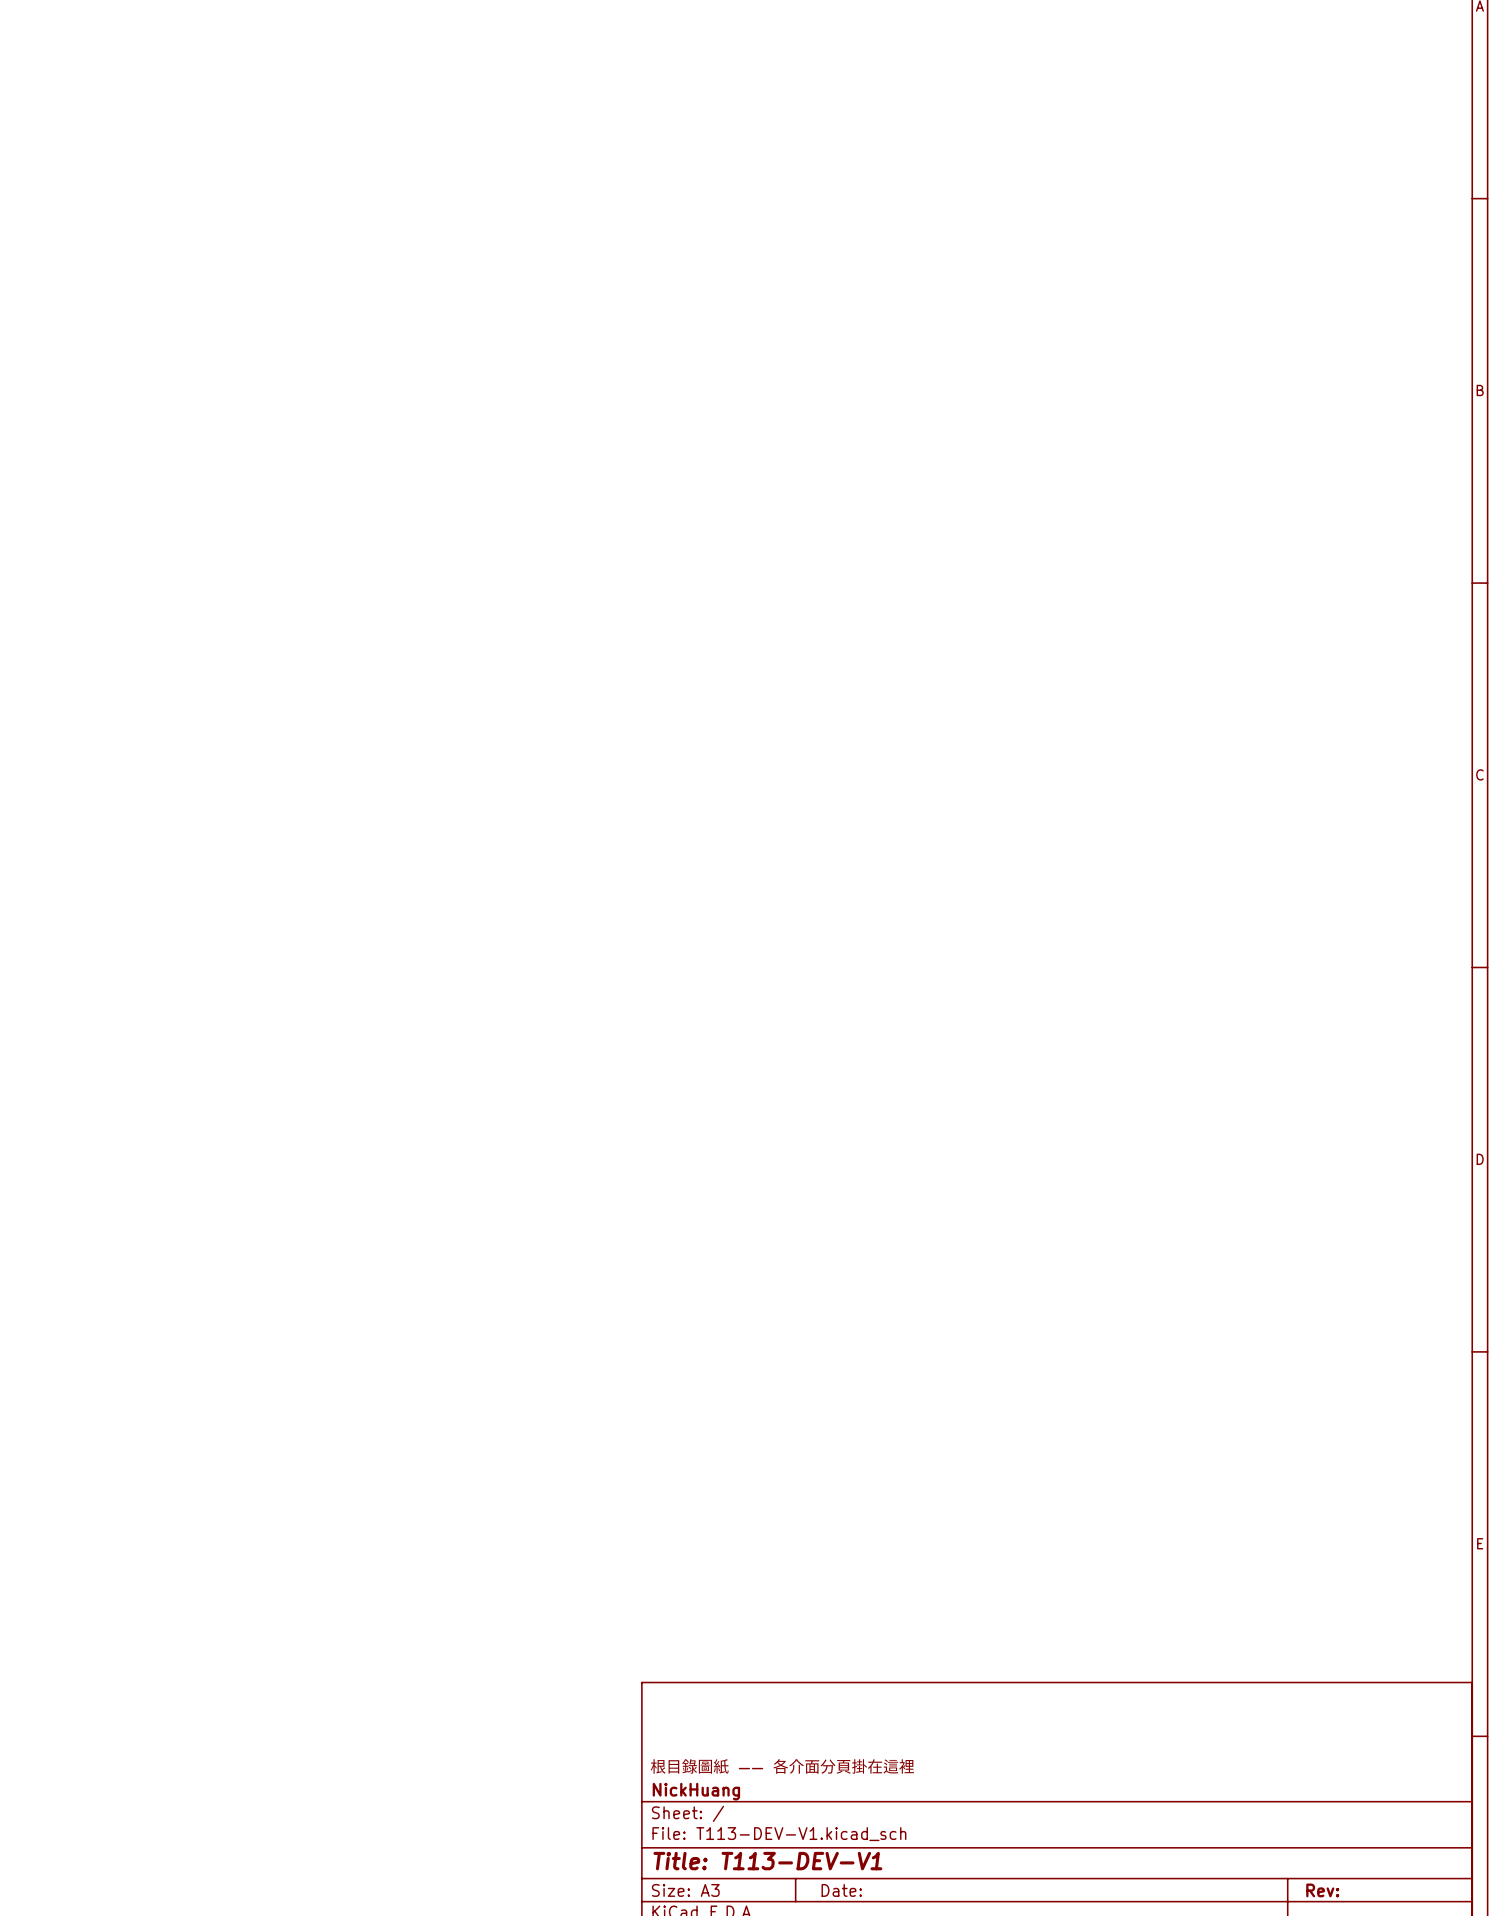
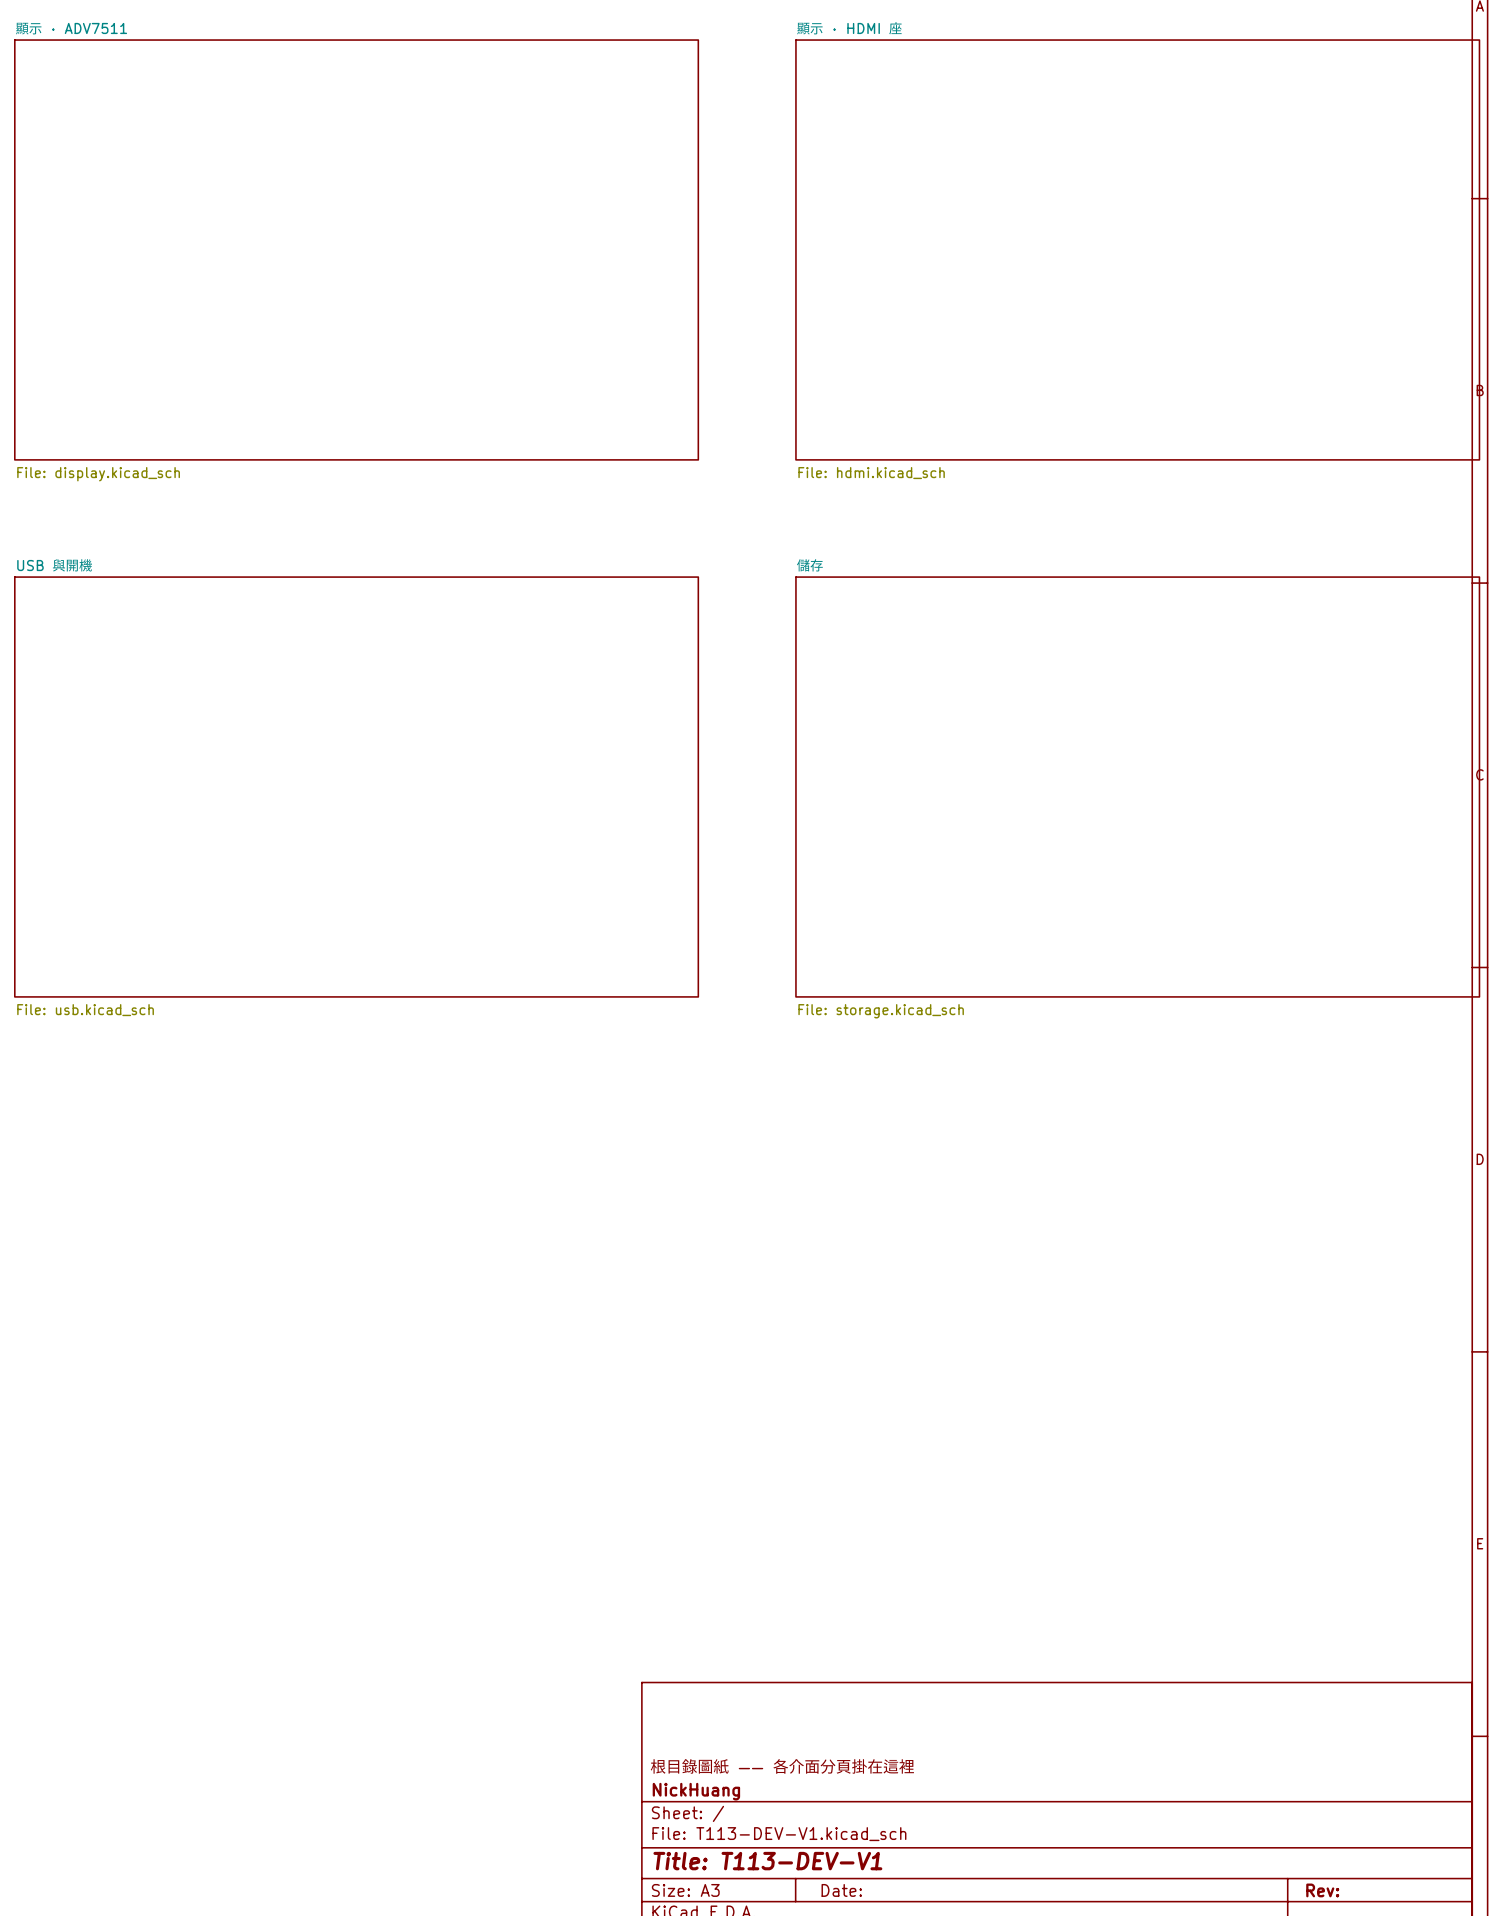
sheet 顯示 · ADV7511: none -> File: display.kicad_sch (356, 249)
sheet 顯示 · HDMI 座: none -> File: hdmi.kicad_sch (1137, 249)
sheet USB 與開機: none -> File: usb.kicad_sch (356, 787)
sheet 儲存: none -> File: storage.kicad_sch (1137, 787)

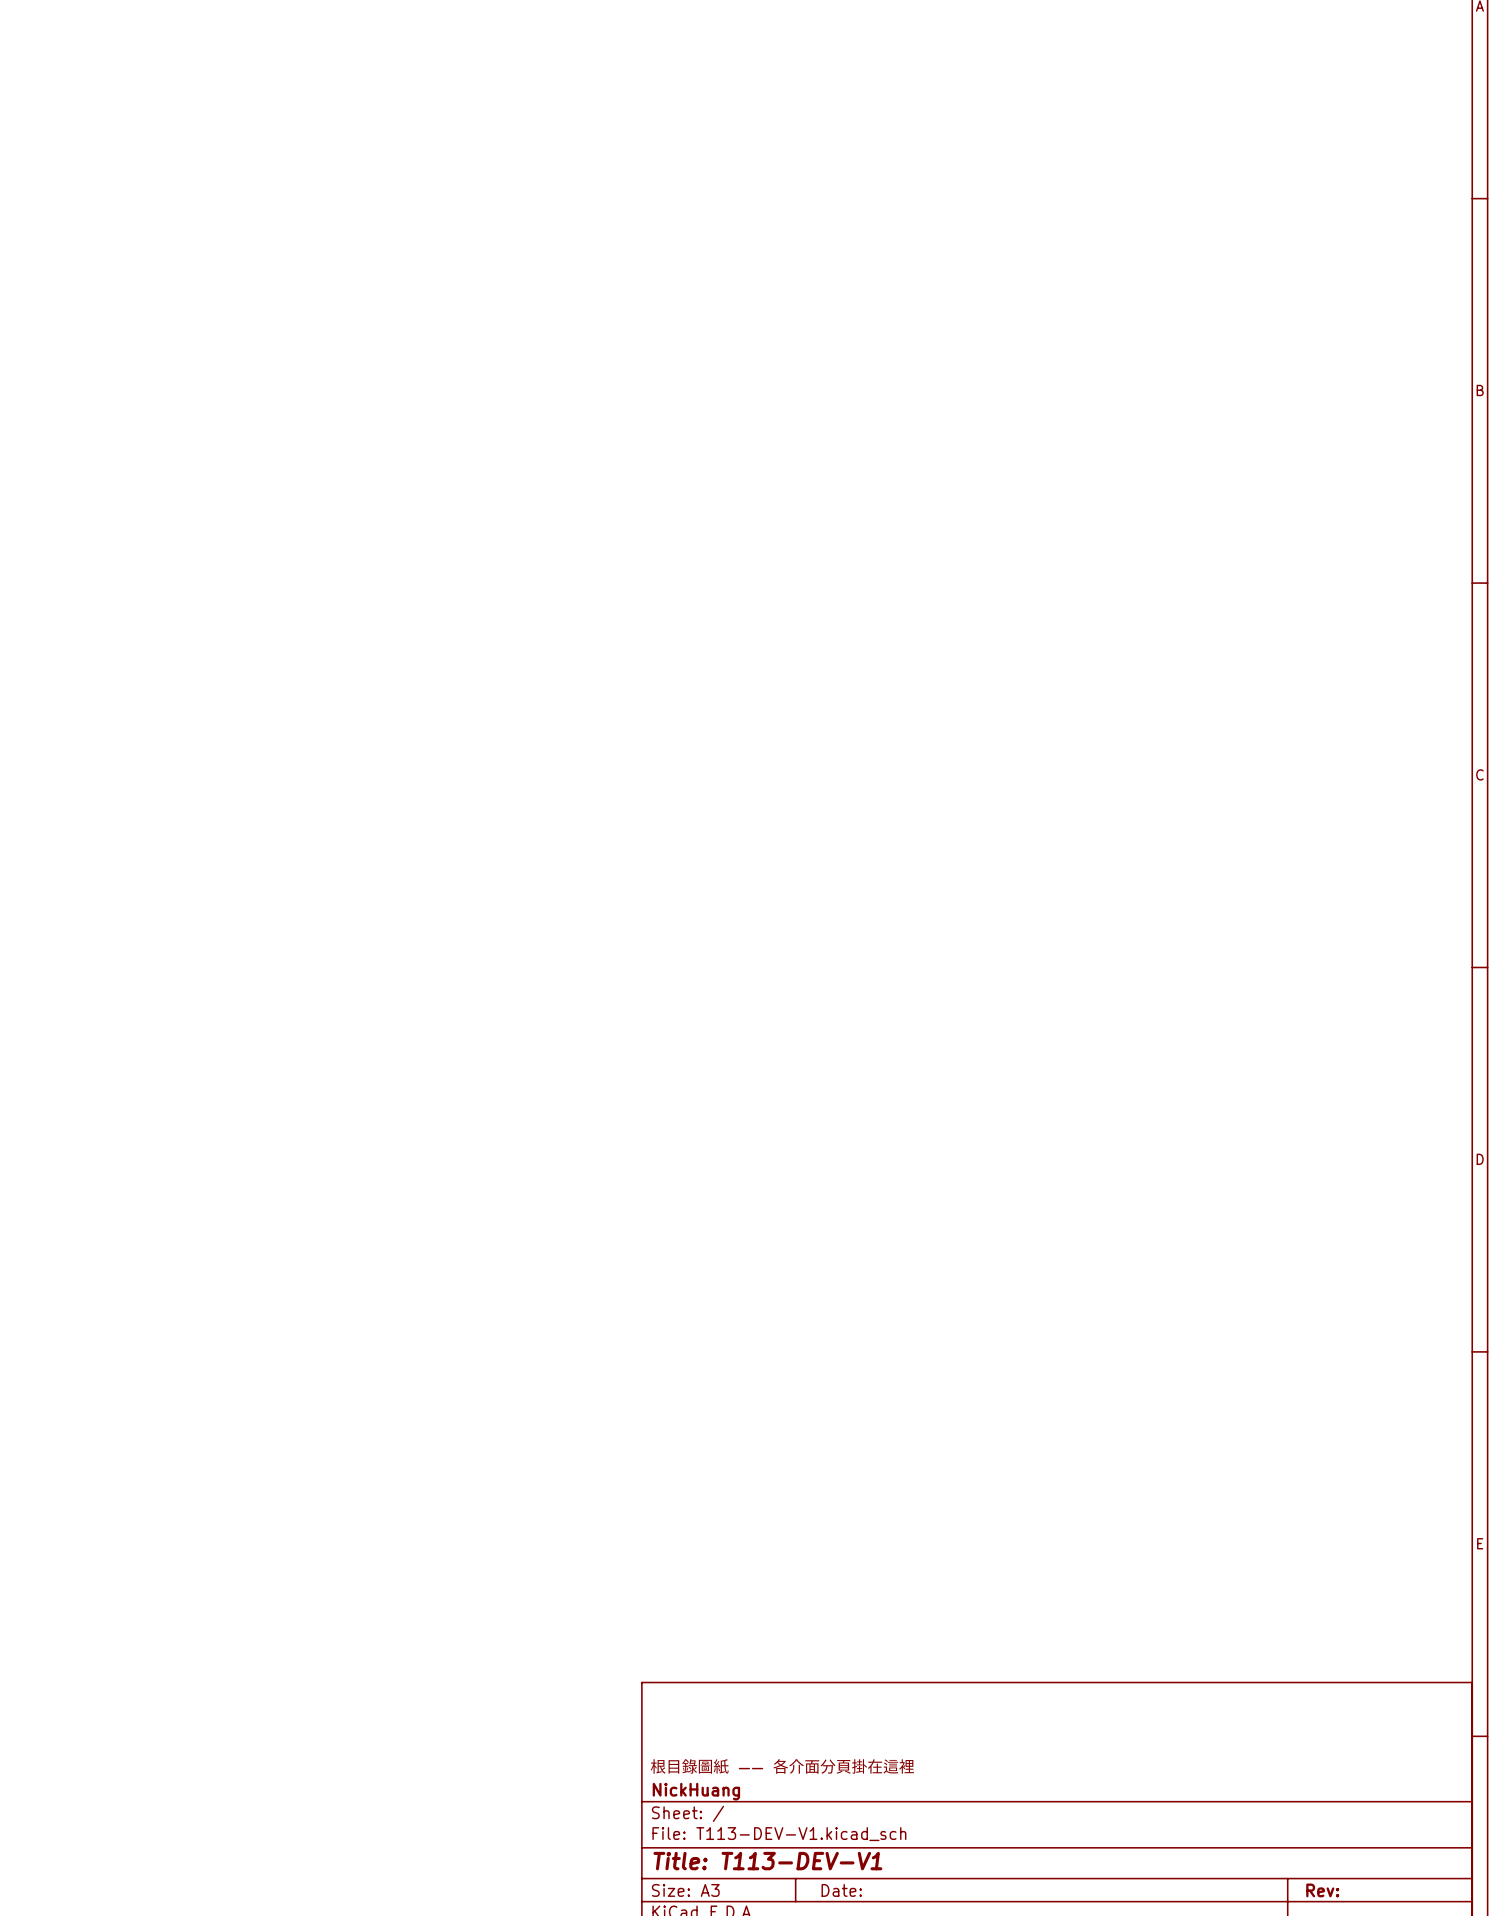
sheet 顯示 · ADV7511: File: display.kicad_sch (356, 249) -> none
sheet 顯示 · HDMI 座: File: hdmi.kicad_sch (1137, 249) -> none
sheet USB 與開機: File: usb.kicad_sch (356, 787) -> none
sheet 儲存: File: storage.kicad_sch (1137, 787) -> none

